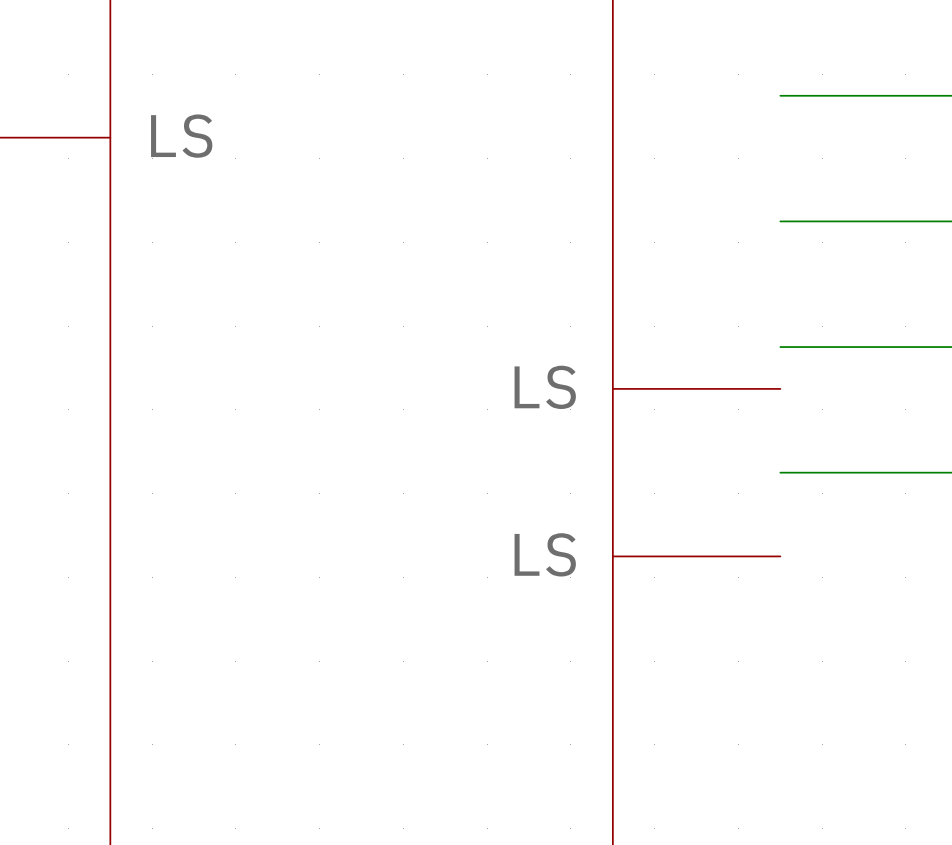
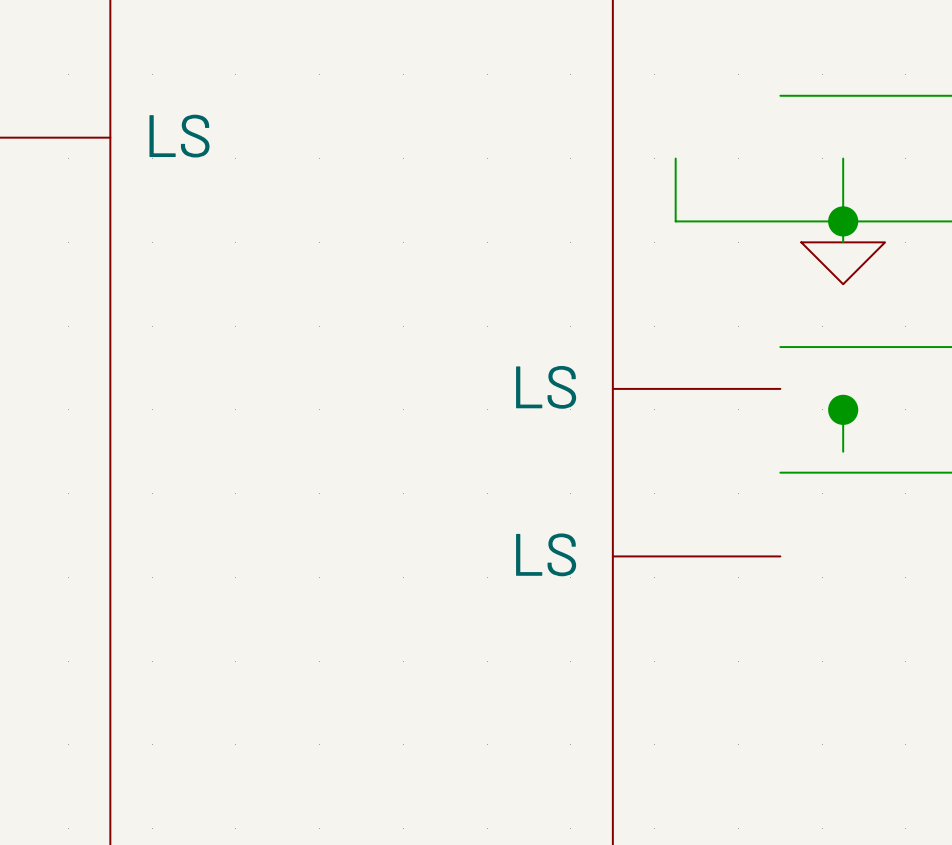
wire: none -> (675, 158) (675, 221) (780, 221)
wire: none -> (843, 158) (843, 242)
junction: none -> (843, 221)
power symbol: none -> (843, 263)
wire: none -> (843, 409) (843, 451)
junction: none -> (843, 409)

